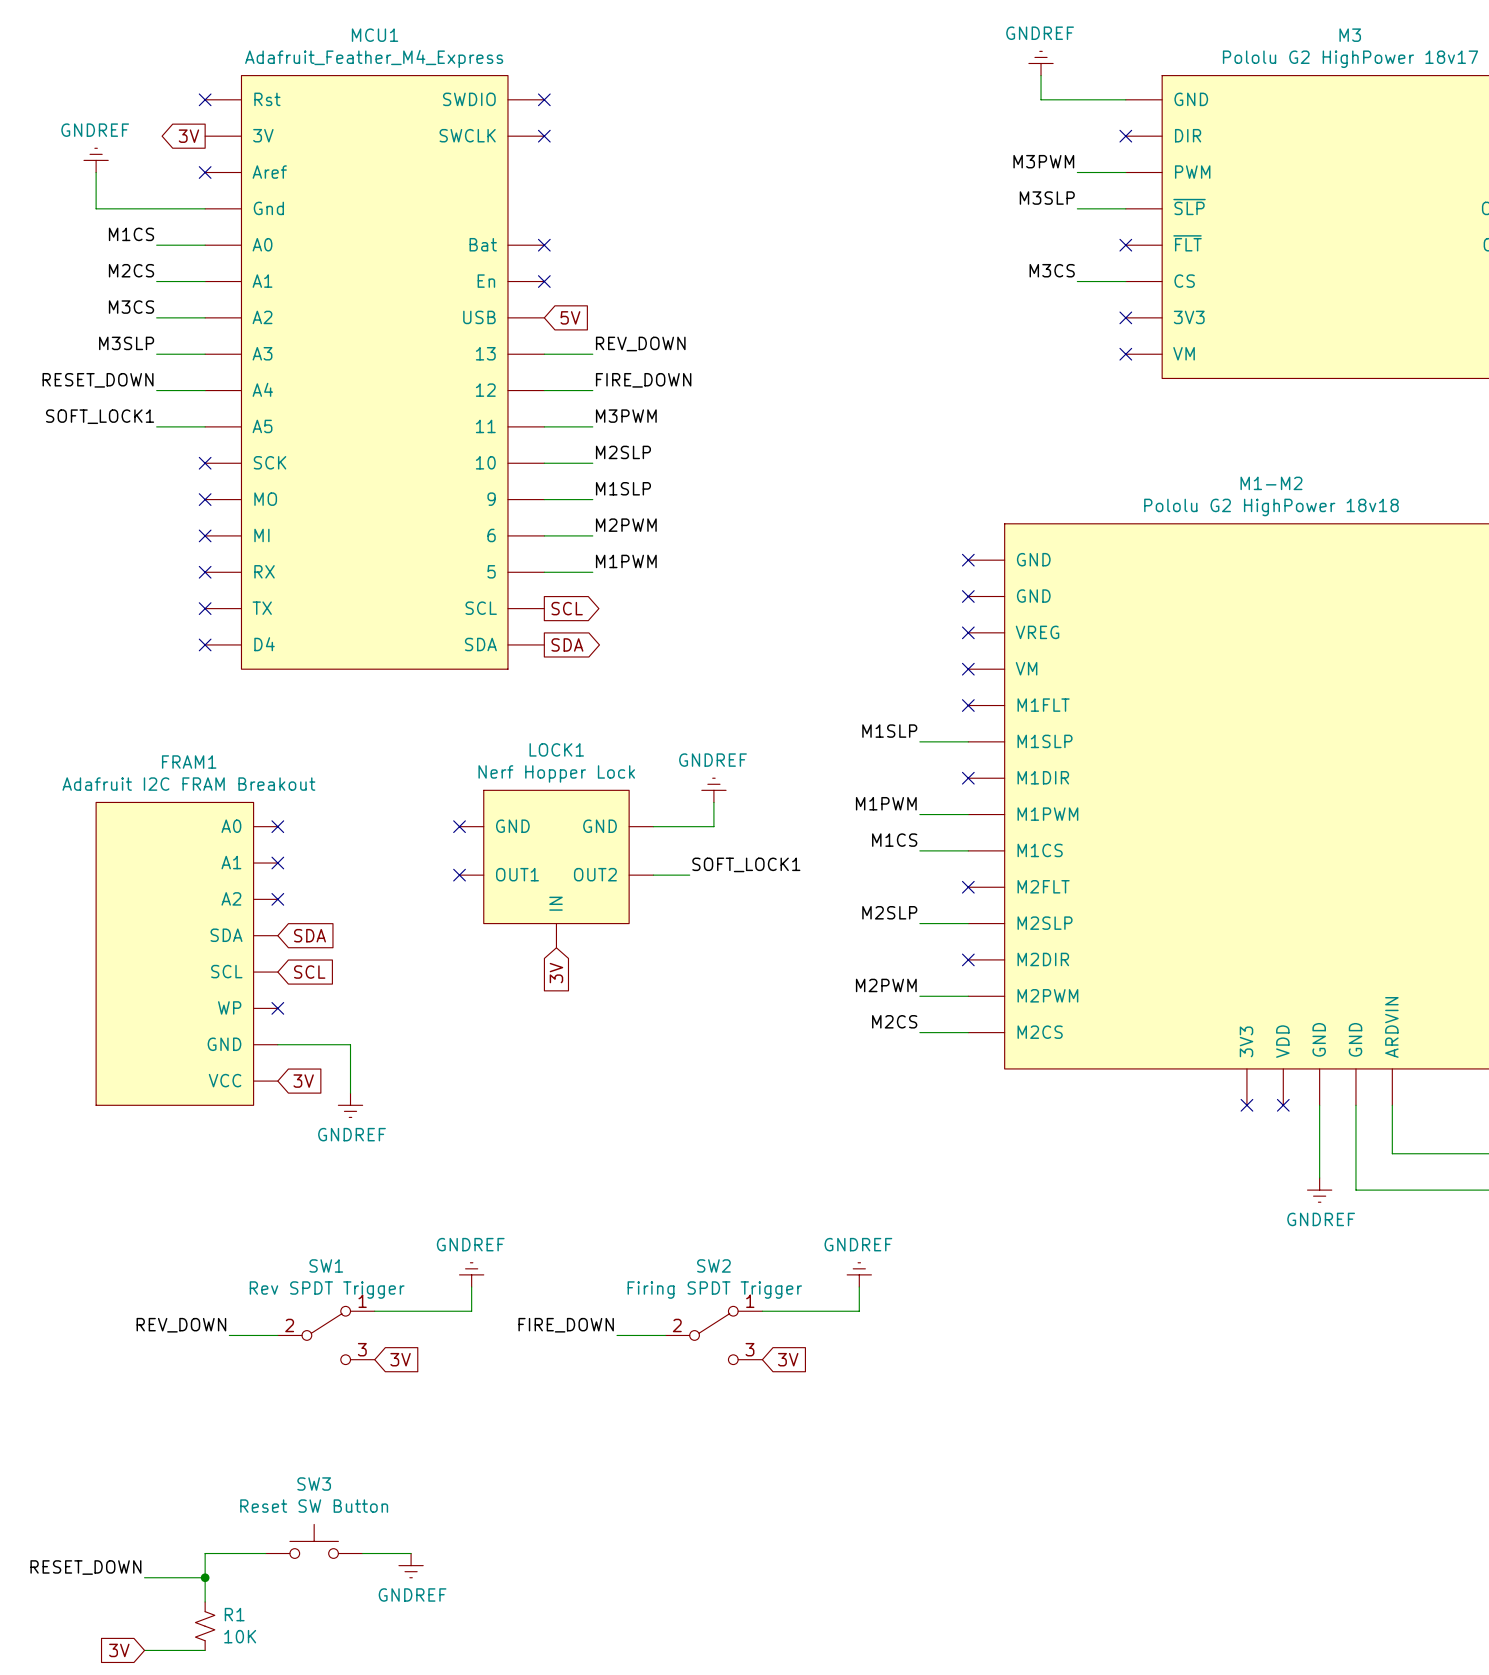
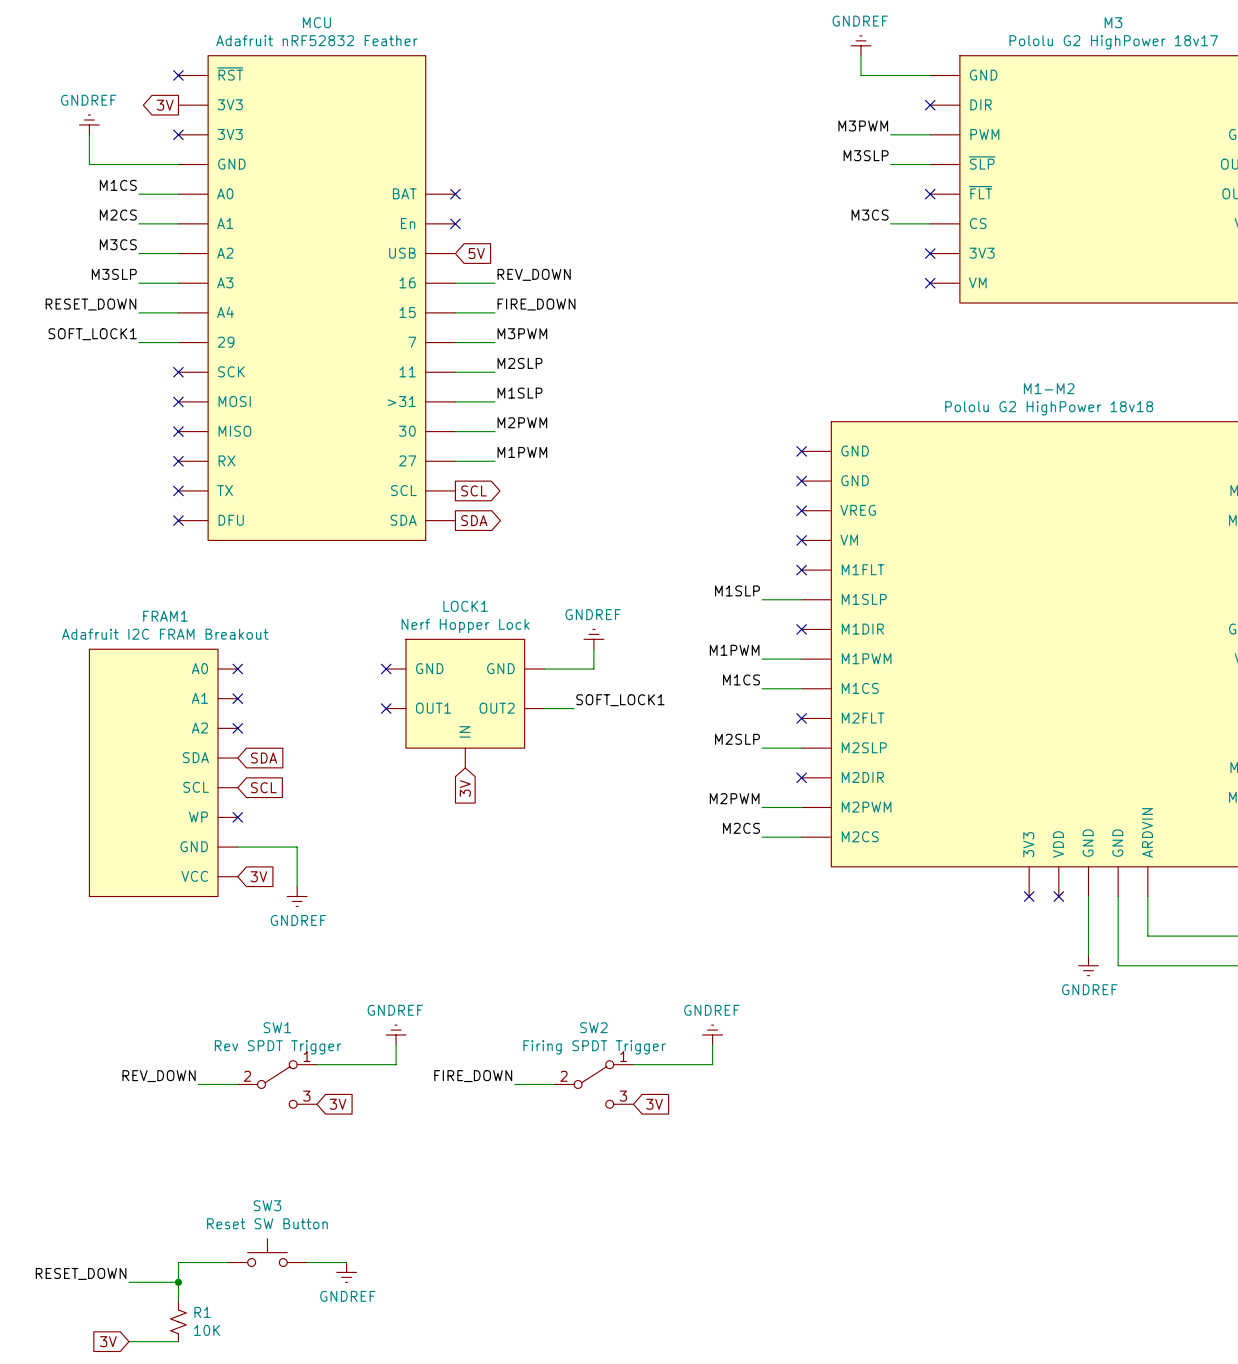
no-connect mark: (544, 99) -> none
no-connect mark: (544, 136) -> none
MCU1: Adafruit_Feather_M4_Express (374, 372) -> none
MCU: none -> Adafruit nRF52832 Feather (316, 298)

